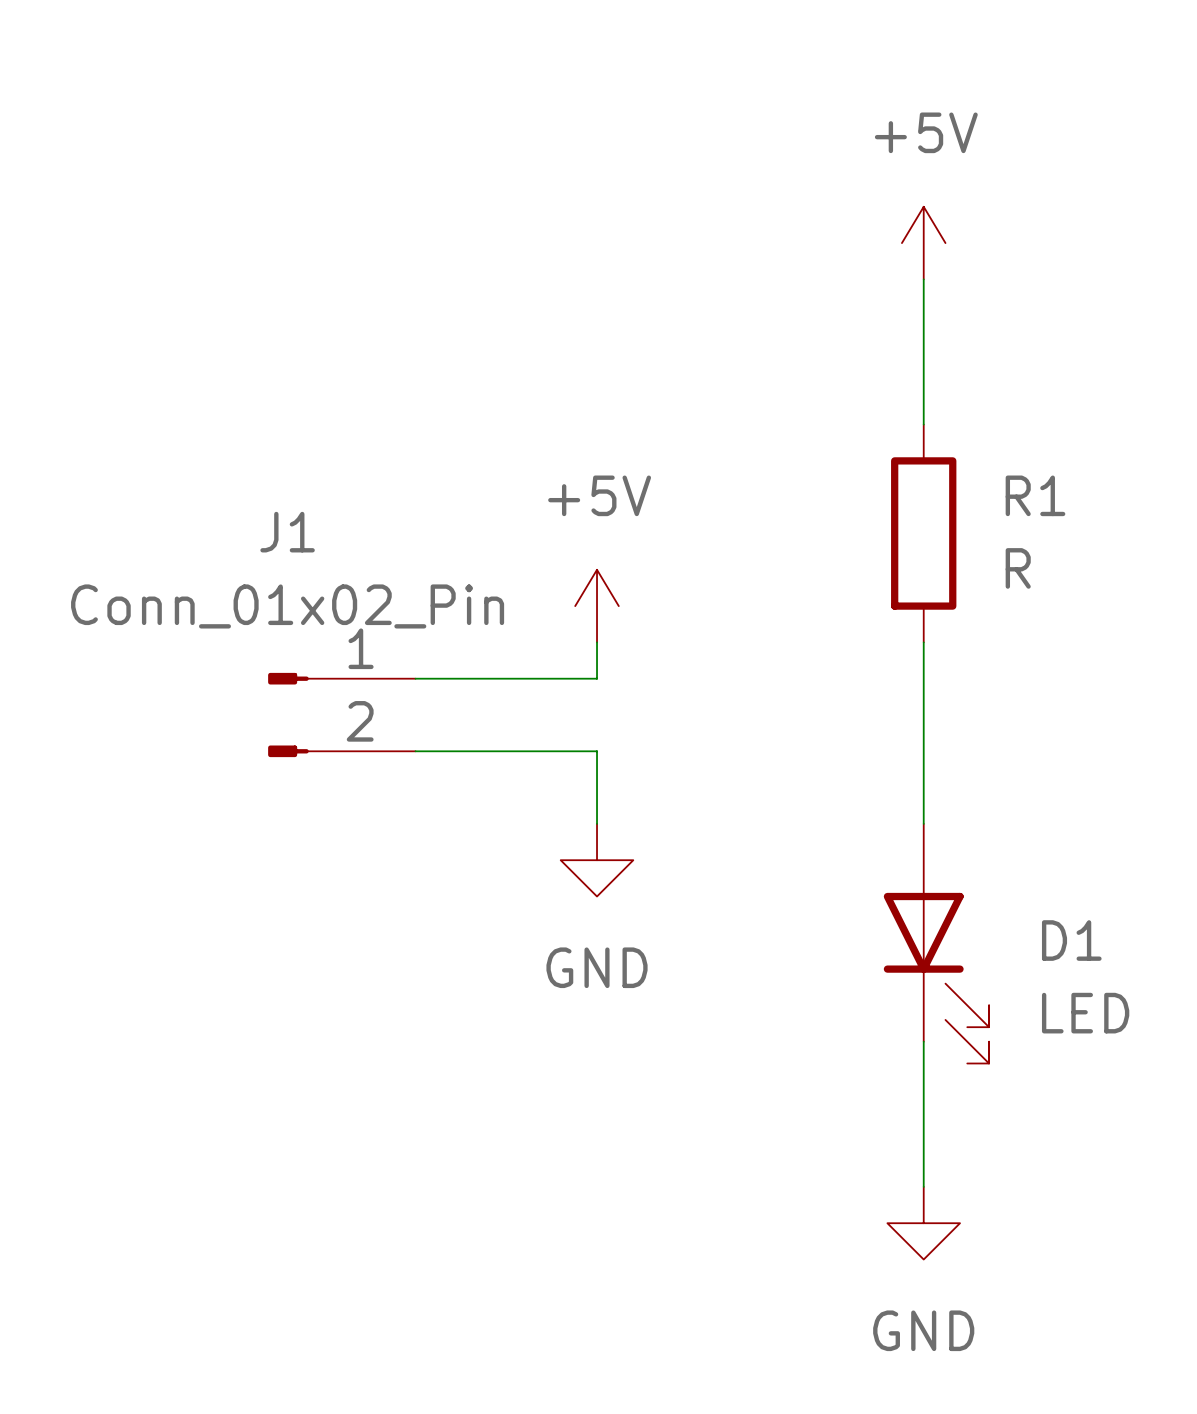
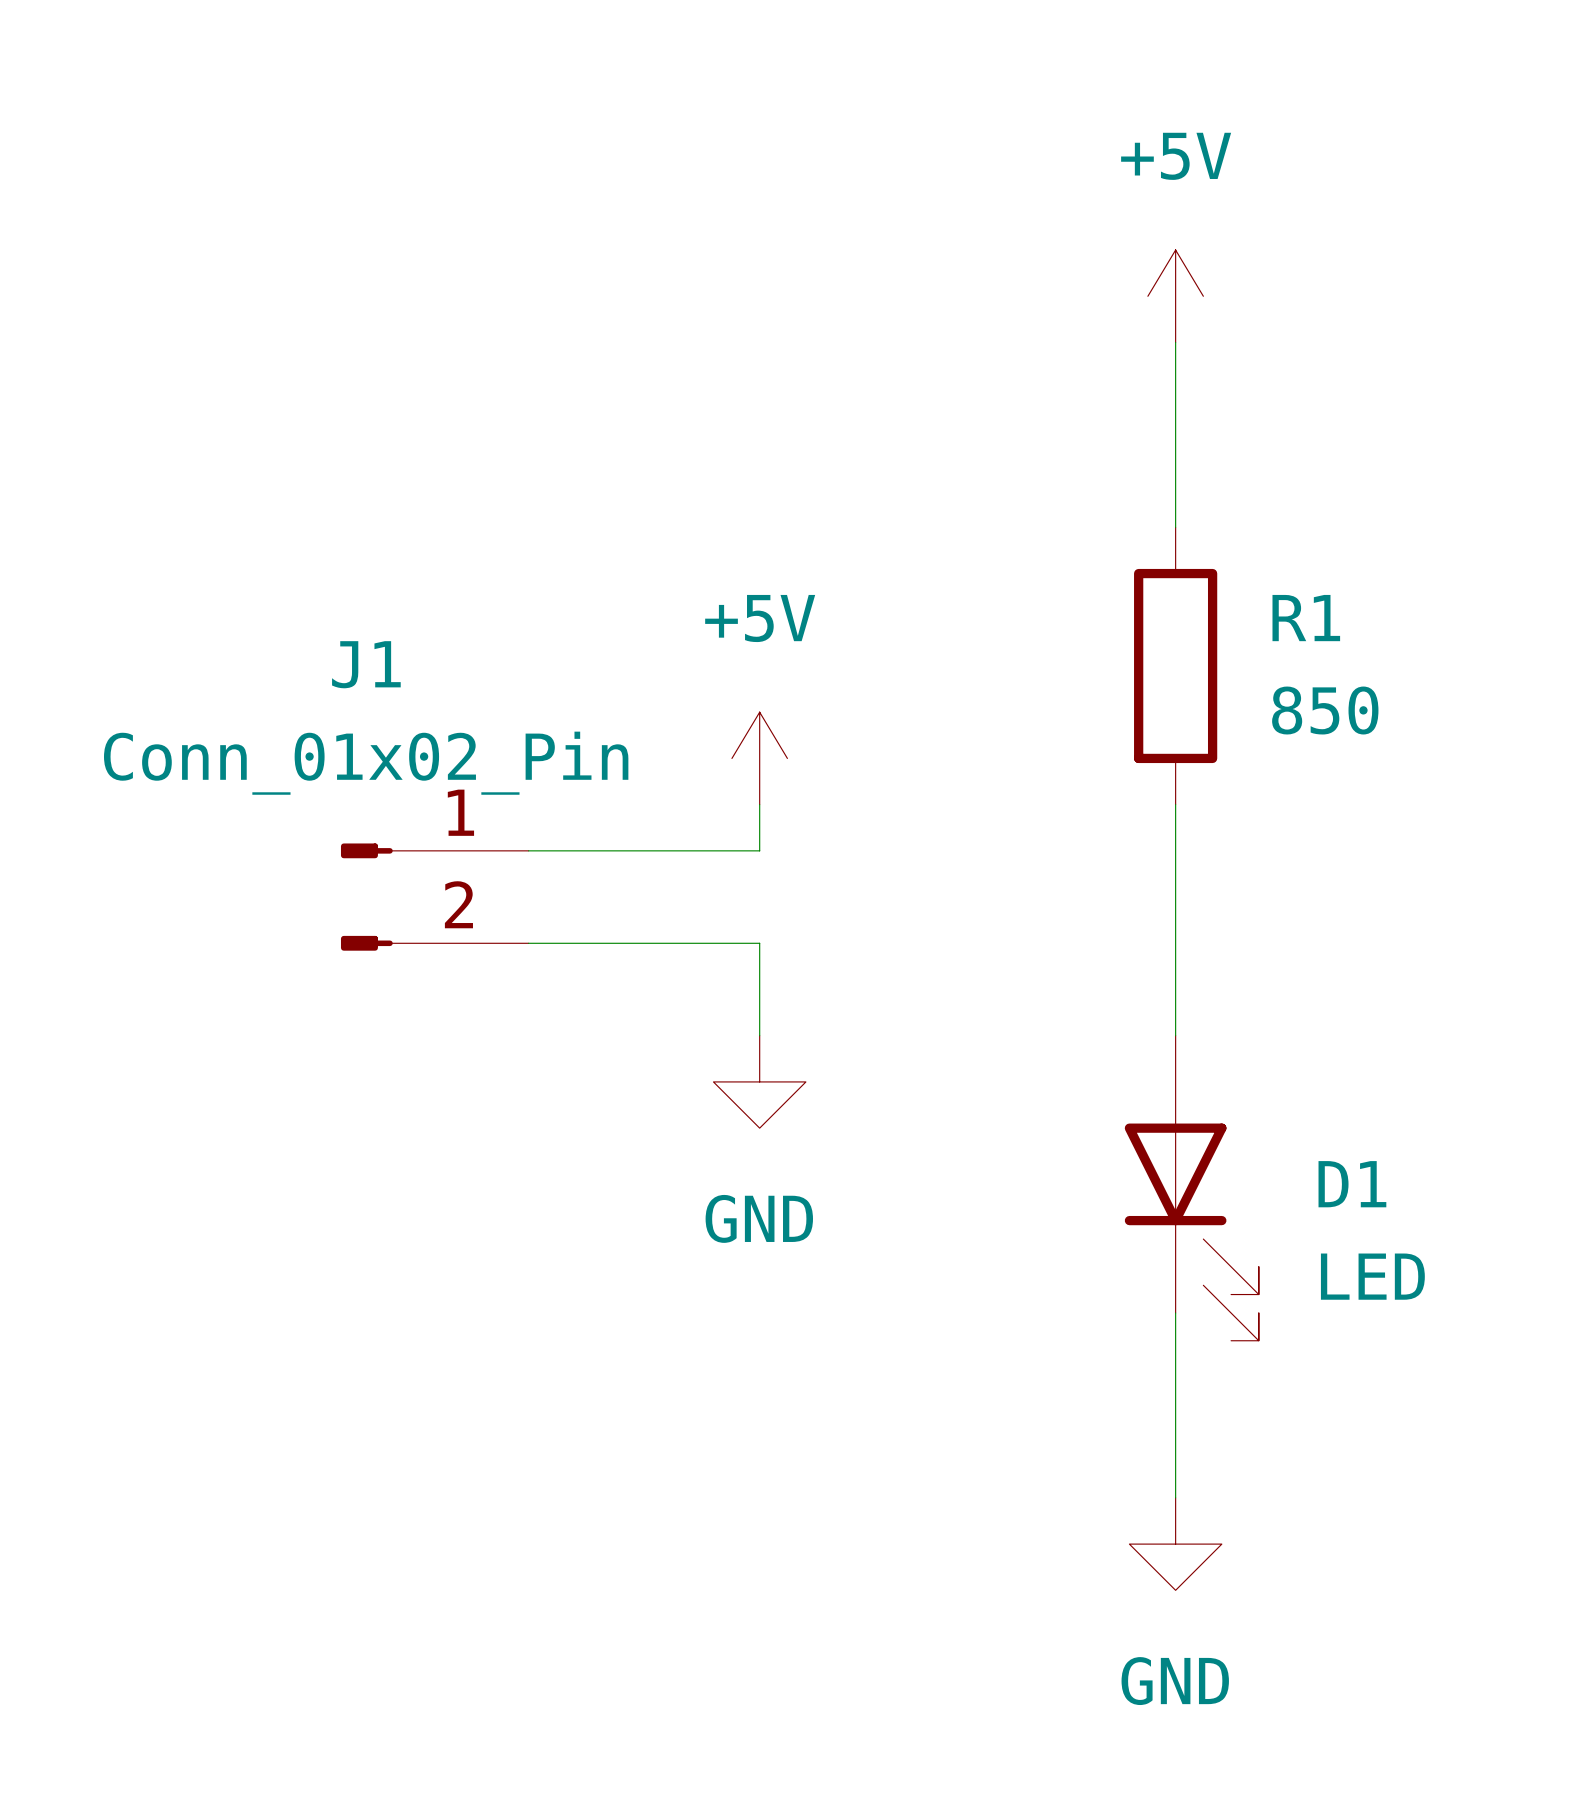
R1 value: R (1018, 568) -> 850 (1325, 710)

